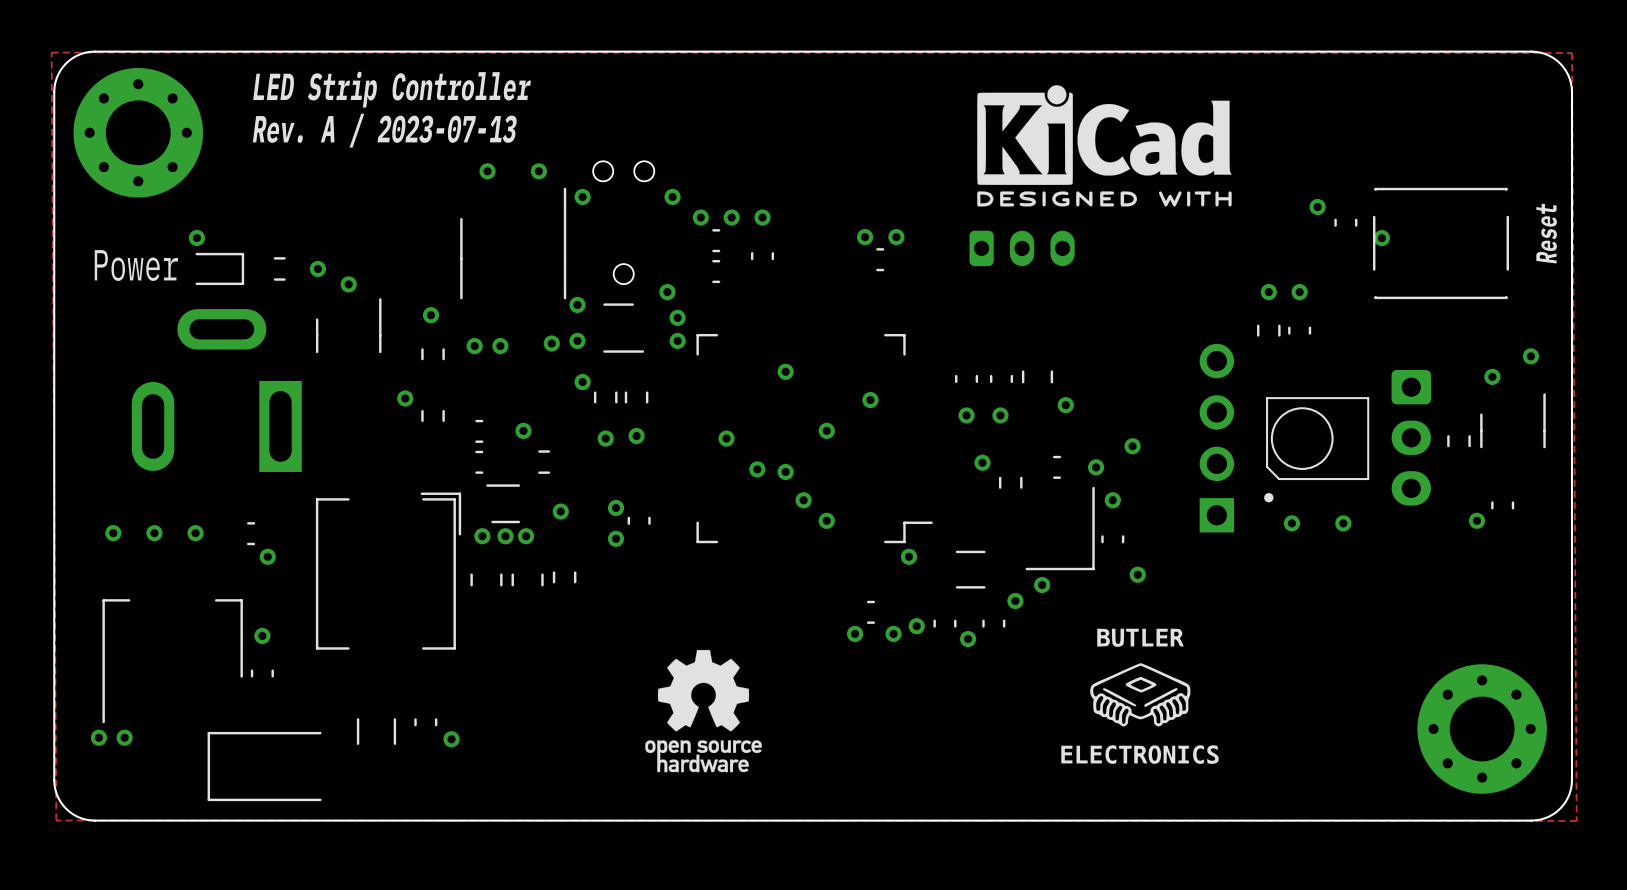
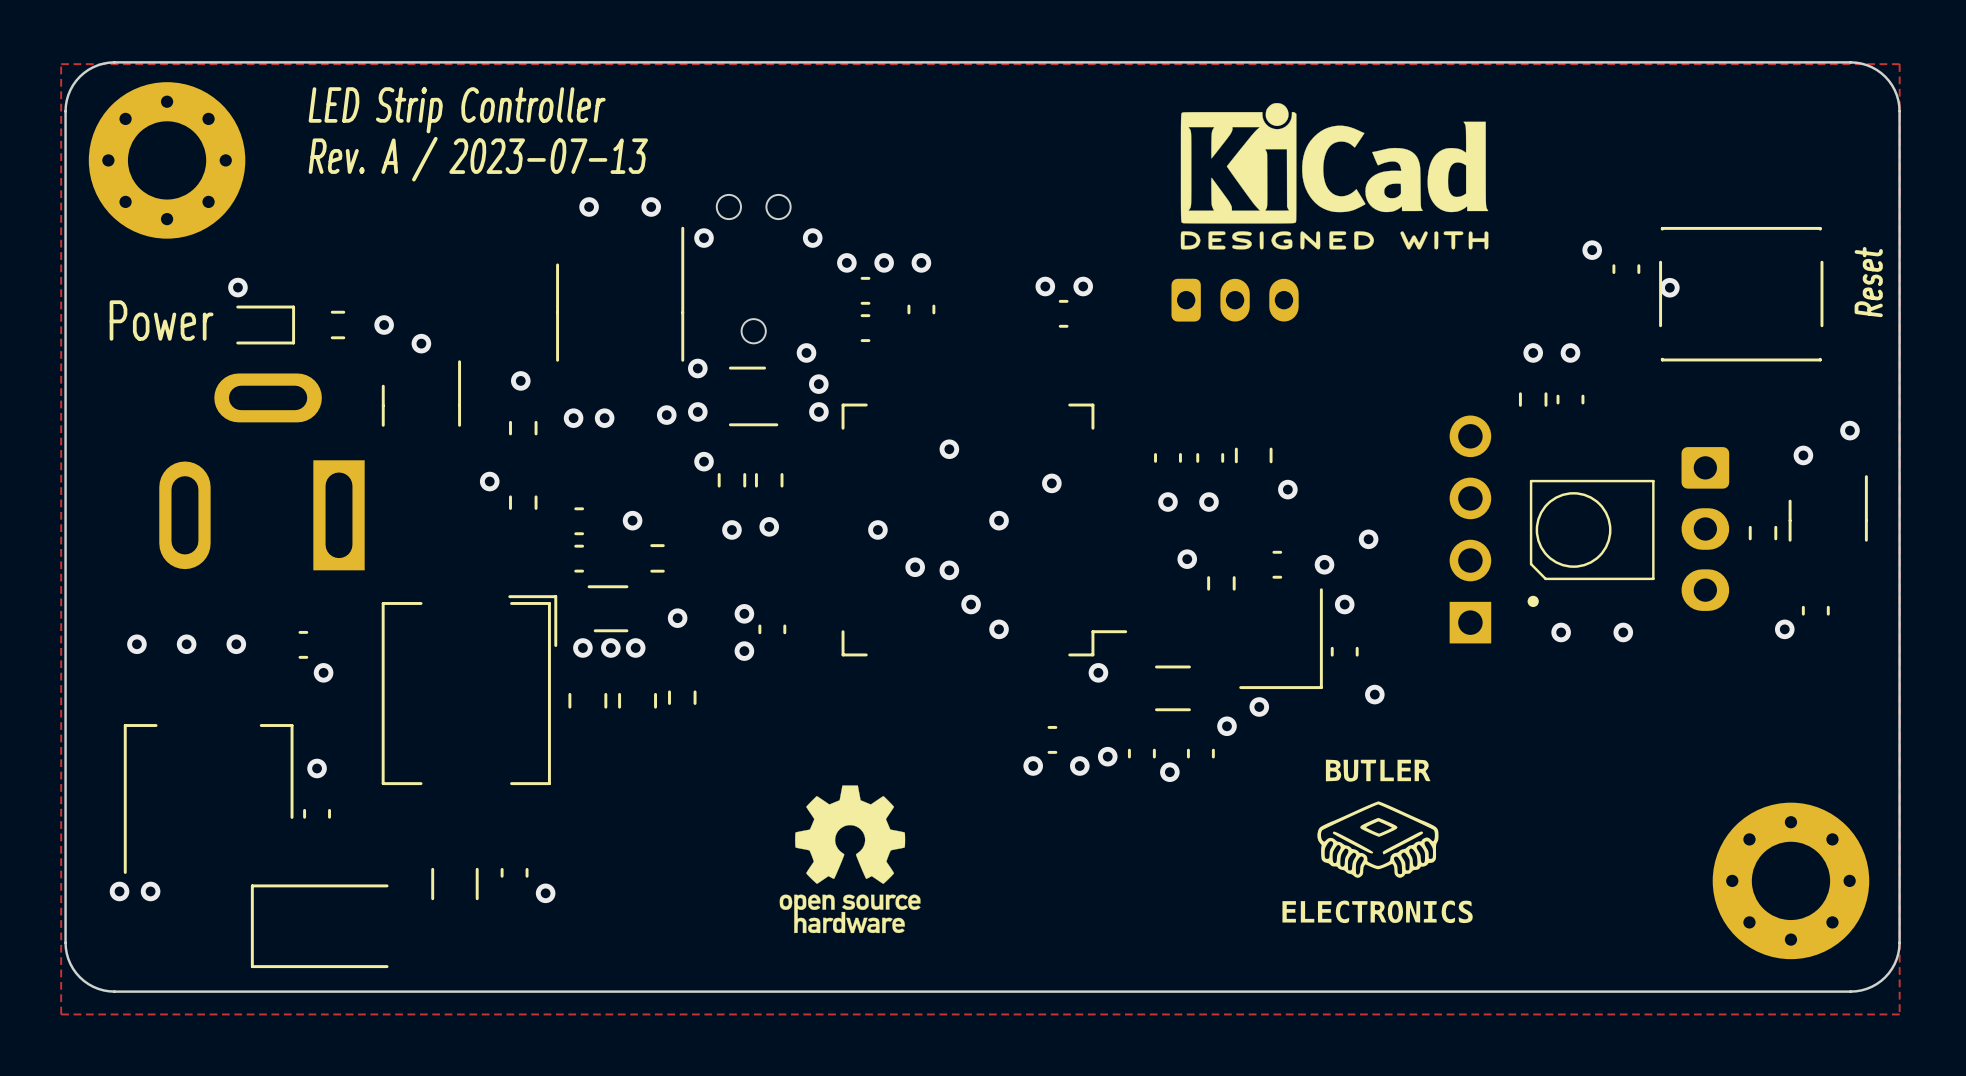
zone outline: (51, 52) (1572, 53) (1576, 821) (56, 820) (51, 52) -> (61, 64) (61, 1014) (1899, 1014) (1899, 64) (61, 64)

